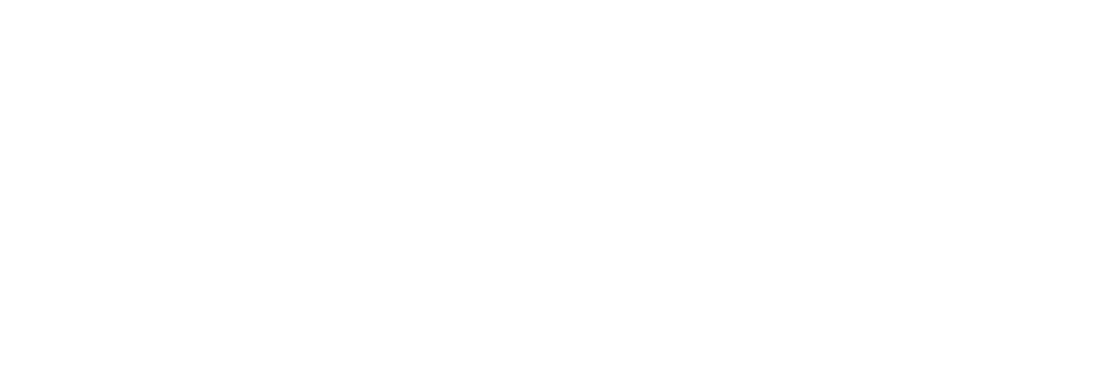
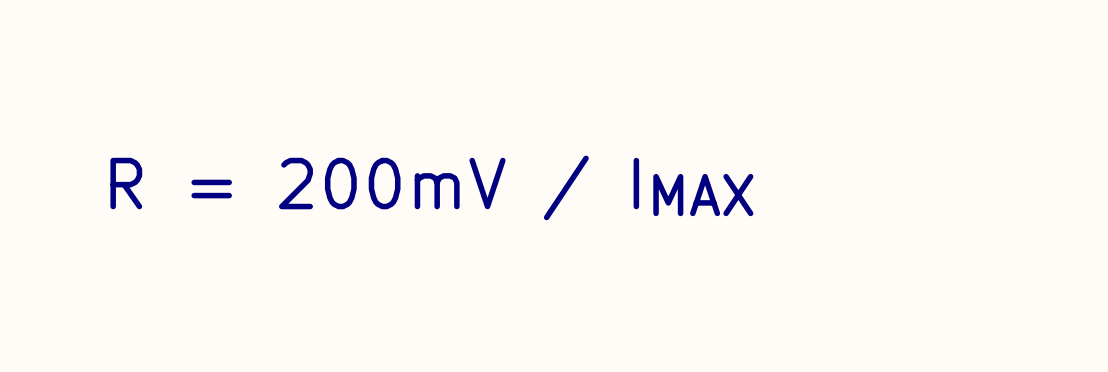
text: none -> R = 200mV / IMAX (431, 187)

